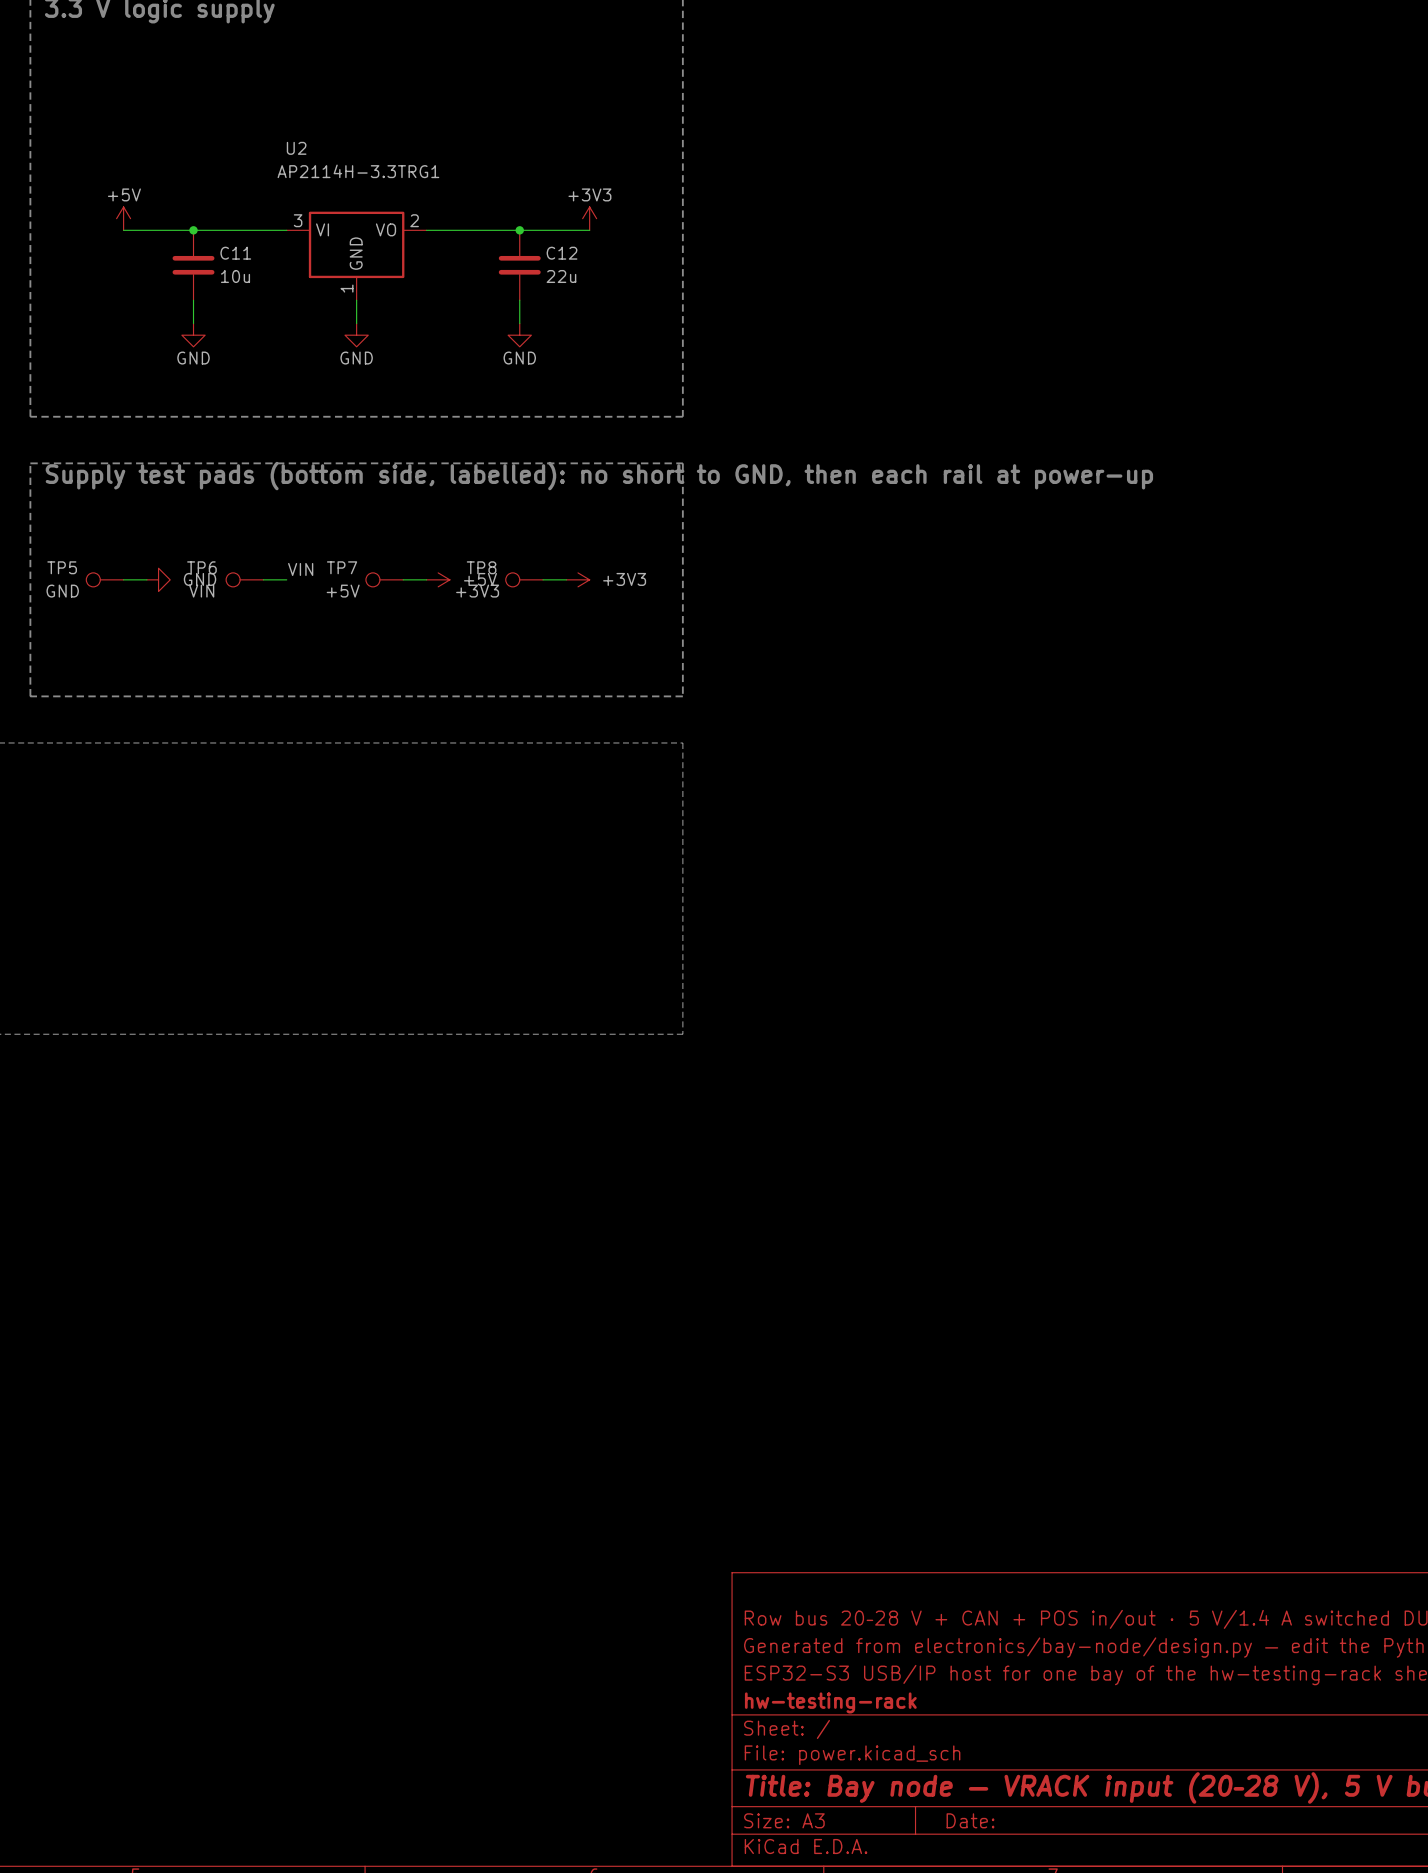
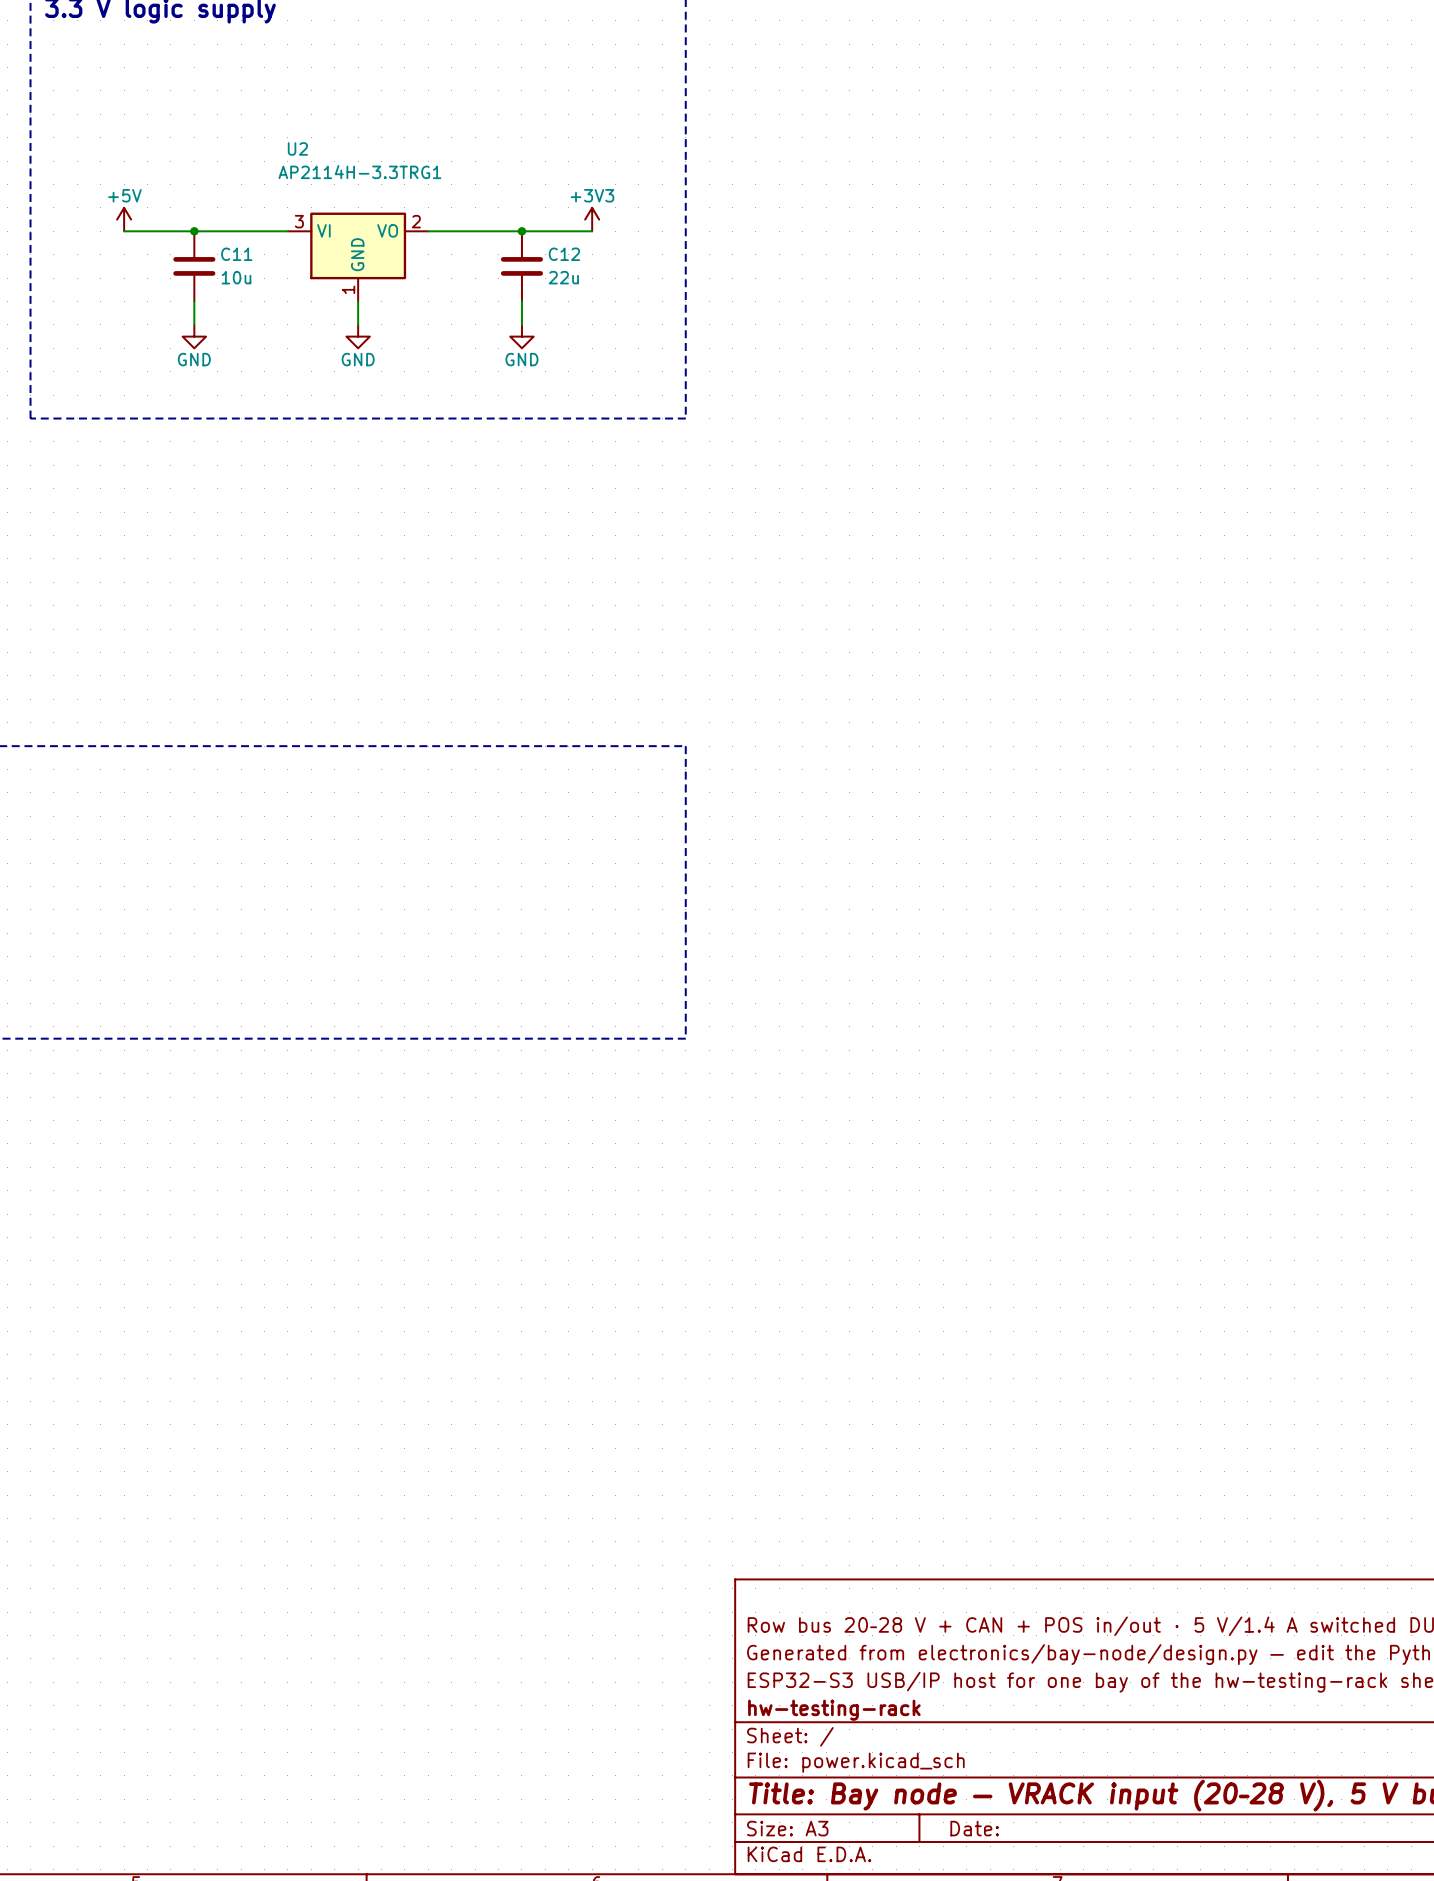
line: (30, 463) (682, 463) (682, 696) (30, 696) (30, 463) -> none
text: Supply test pads (bottom side, labelled): no short to GND, then each rail at power-up (599, 476) -> none
label: VIN (300, 569) -> none
TP5: GND (104, 579) -> none
wire: (123, 579) (146, 579) -> none
power symbol: GND (158, 579) -> none
TP6: VIN (244, 579) -> none
wire: (263, 579) (286, 579) -> none
TP7: +5V (384, 579) -> none
wire: (403, 579) (426, 579) -> none
power symbol: +5V (438, 579) -> none
TP8: +3V3 (524, 579) -> none
wire: (543, 579) (566, 579) -> none
power symbol: +3V3 (578, 579) -> none

